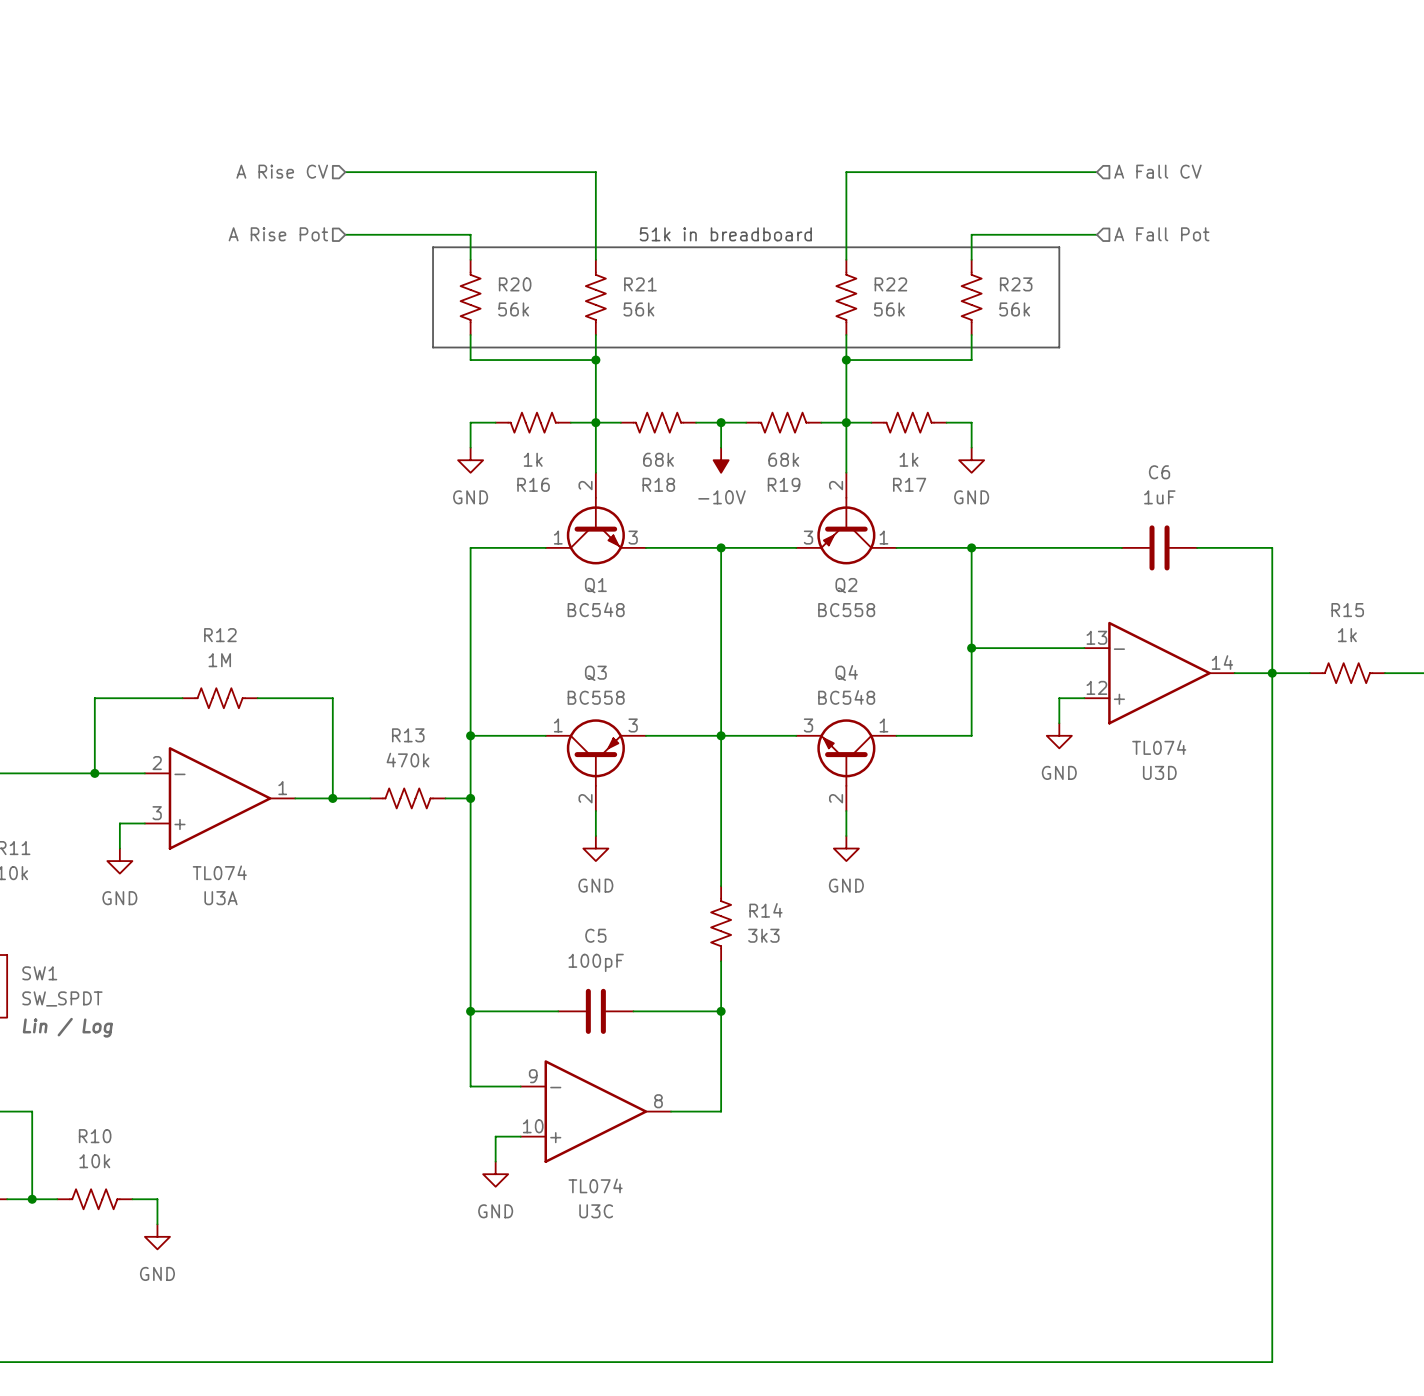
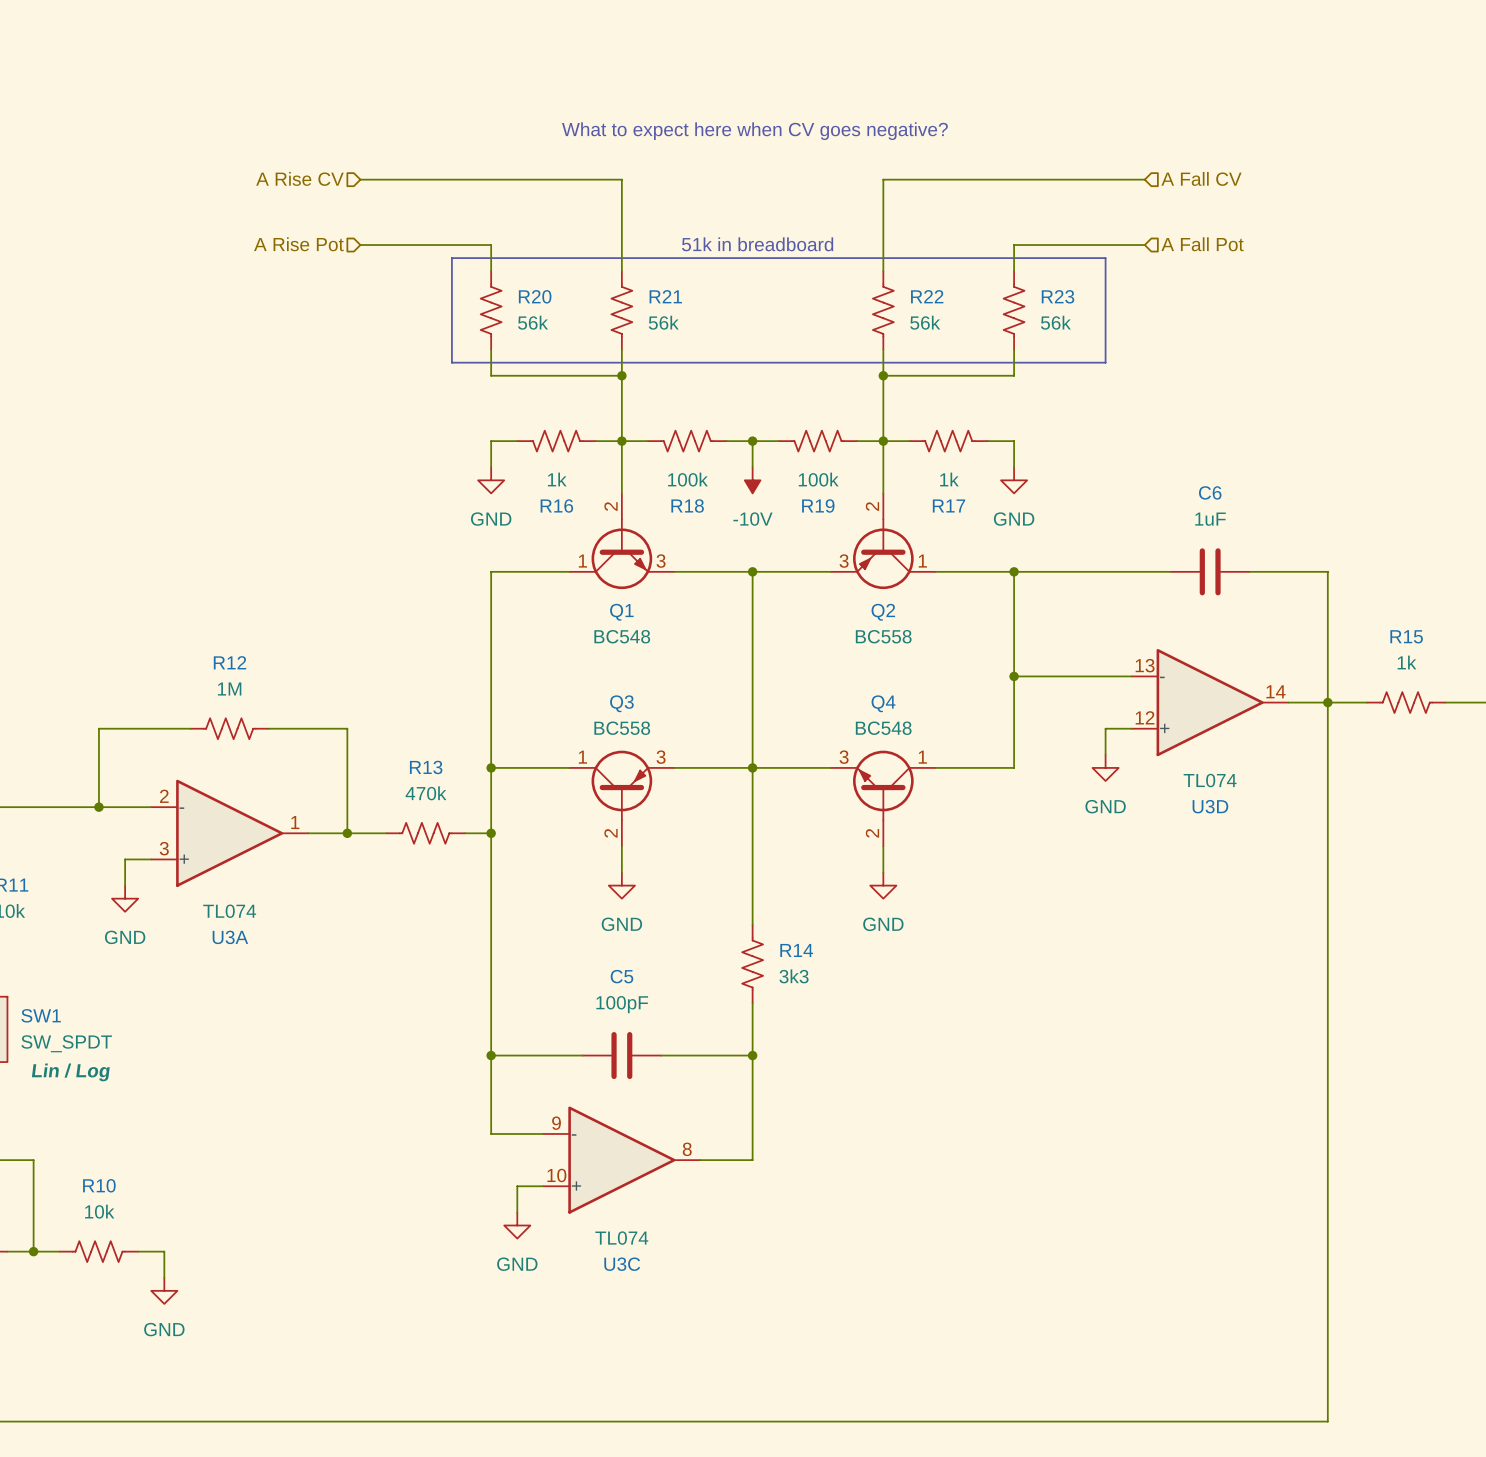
text: none -> What to expect here when CV goes negative? (754, 131)
R18 value: 68k (658, 459) -> 100k (687, 479)
R19 value: 68k (783, 459) -> 100k (818, 479)

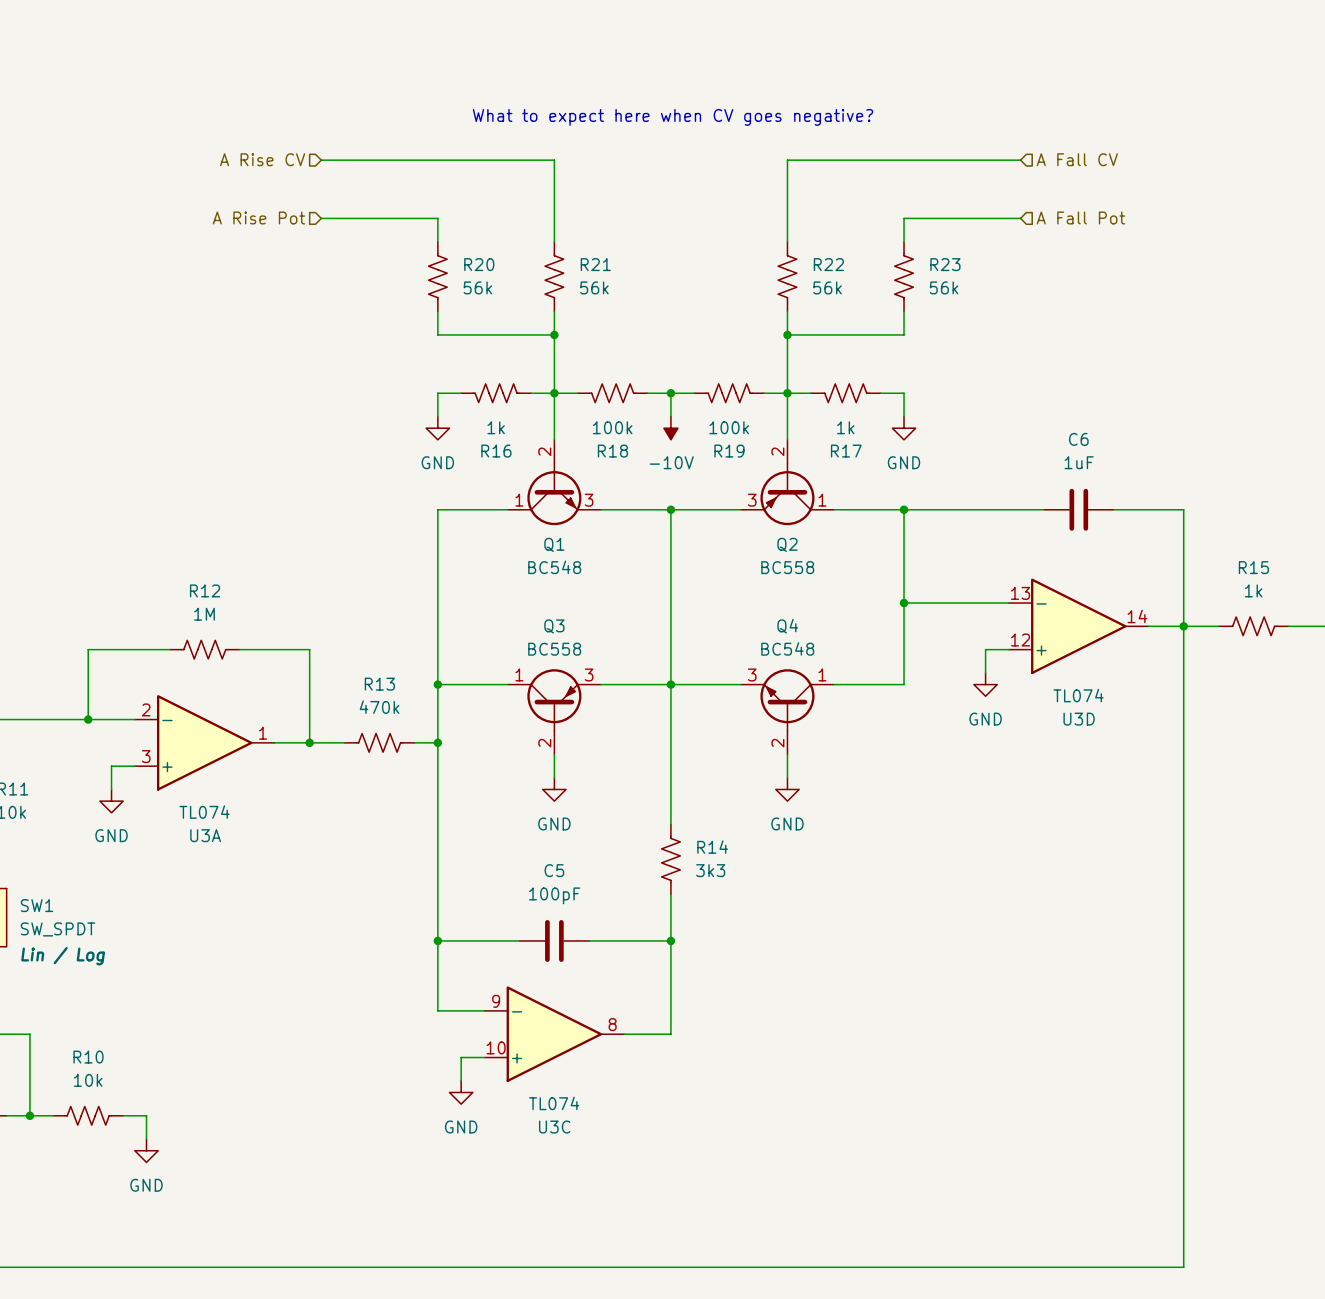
text: 51k in breadboard (757, 244) -> none
line: (451, 258) (1105, 258) (1105, 362) (451, 362) (451, 258) -> none

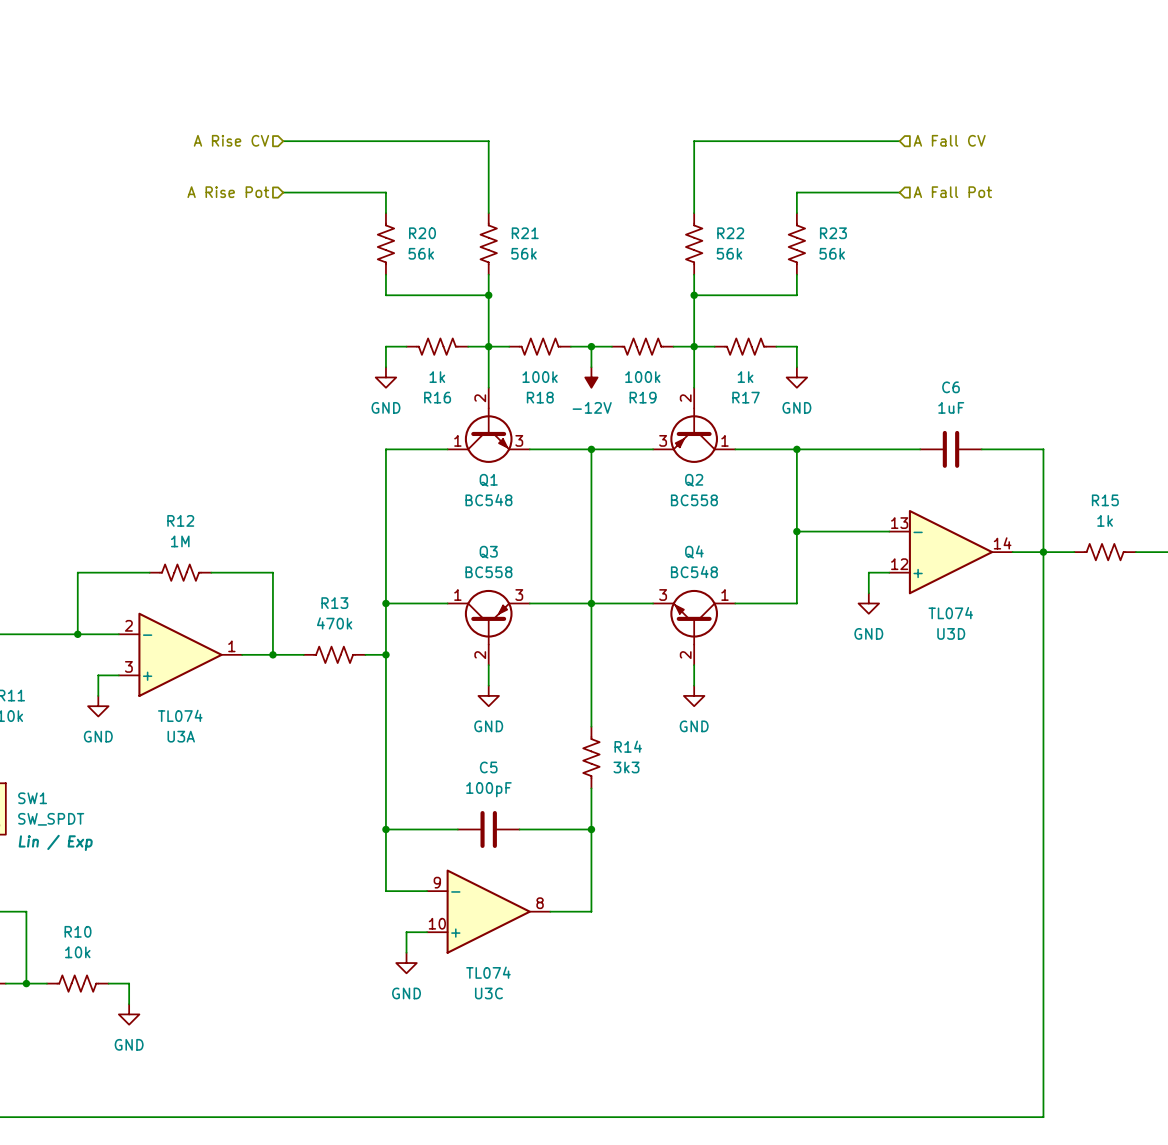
text: What to expect here when CV goes negative? (672, 117) -> none
power symbol: -10V (670, 428) -> -12V (591, 377)
SW1 text: Lin / Log (63, 956) -> Lin / Exp (55, 842)

